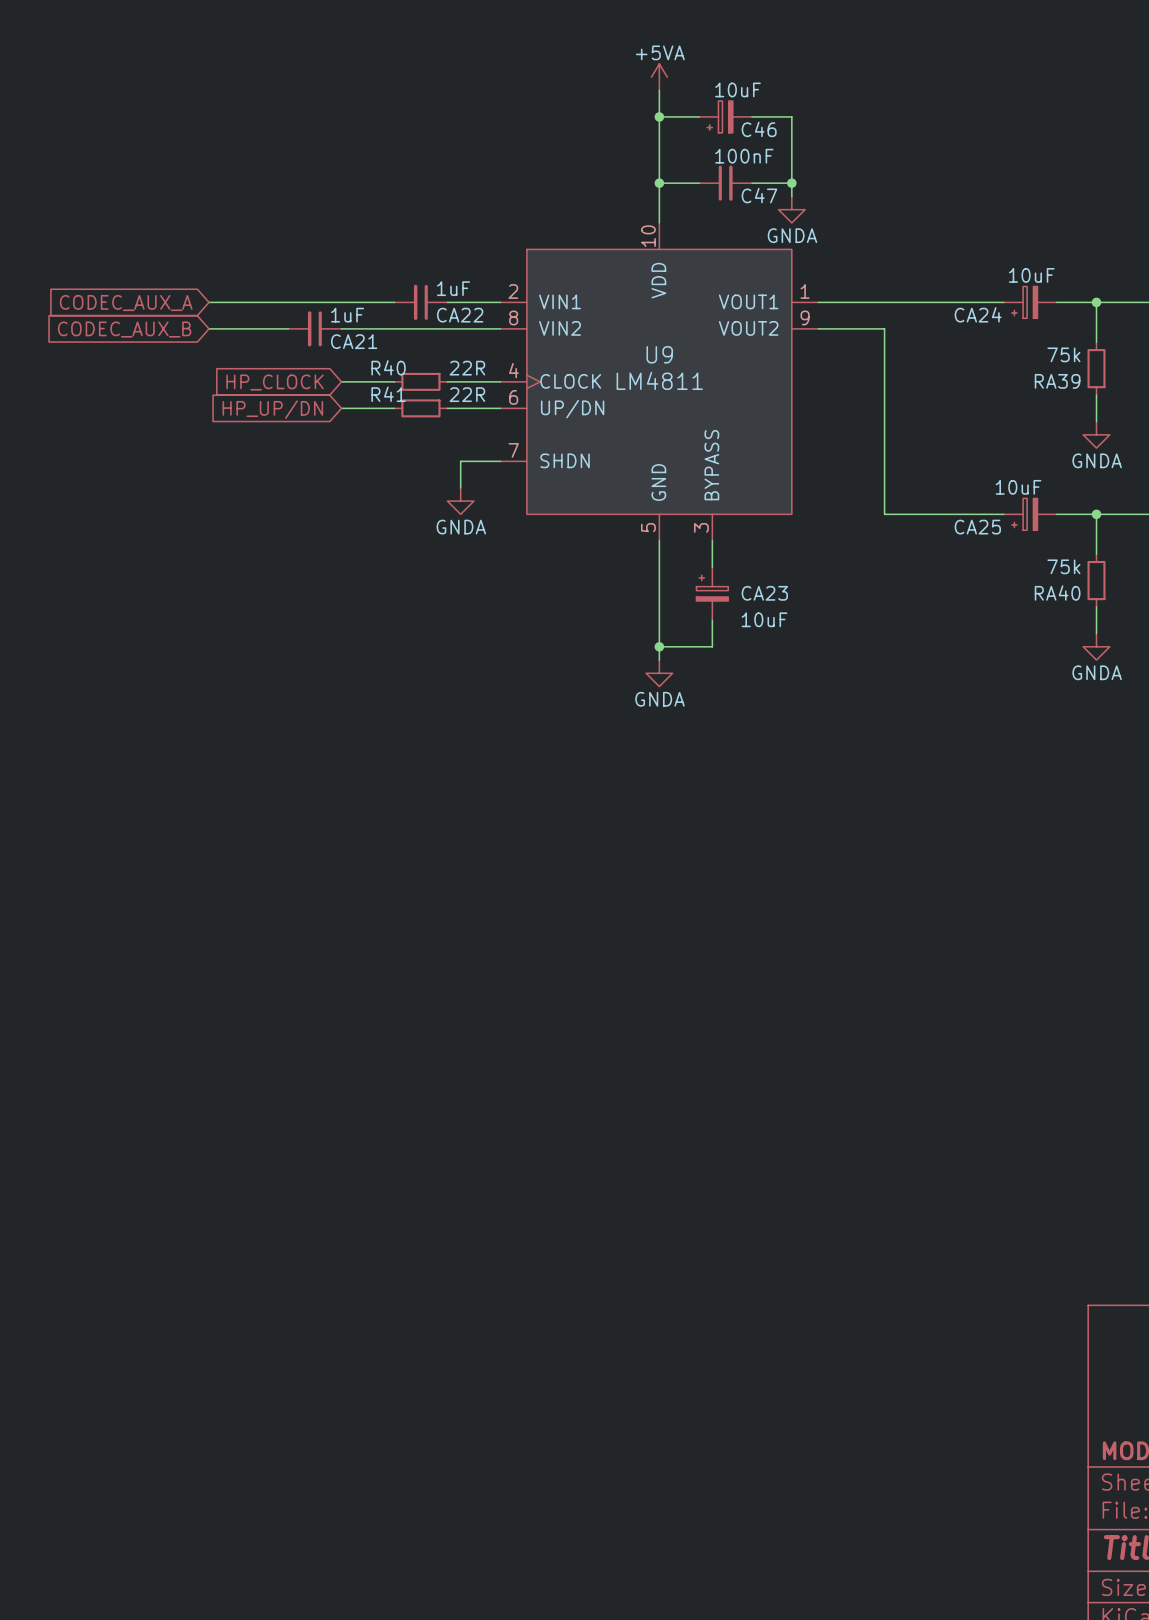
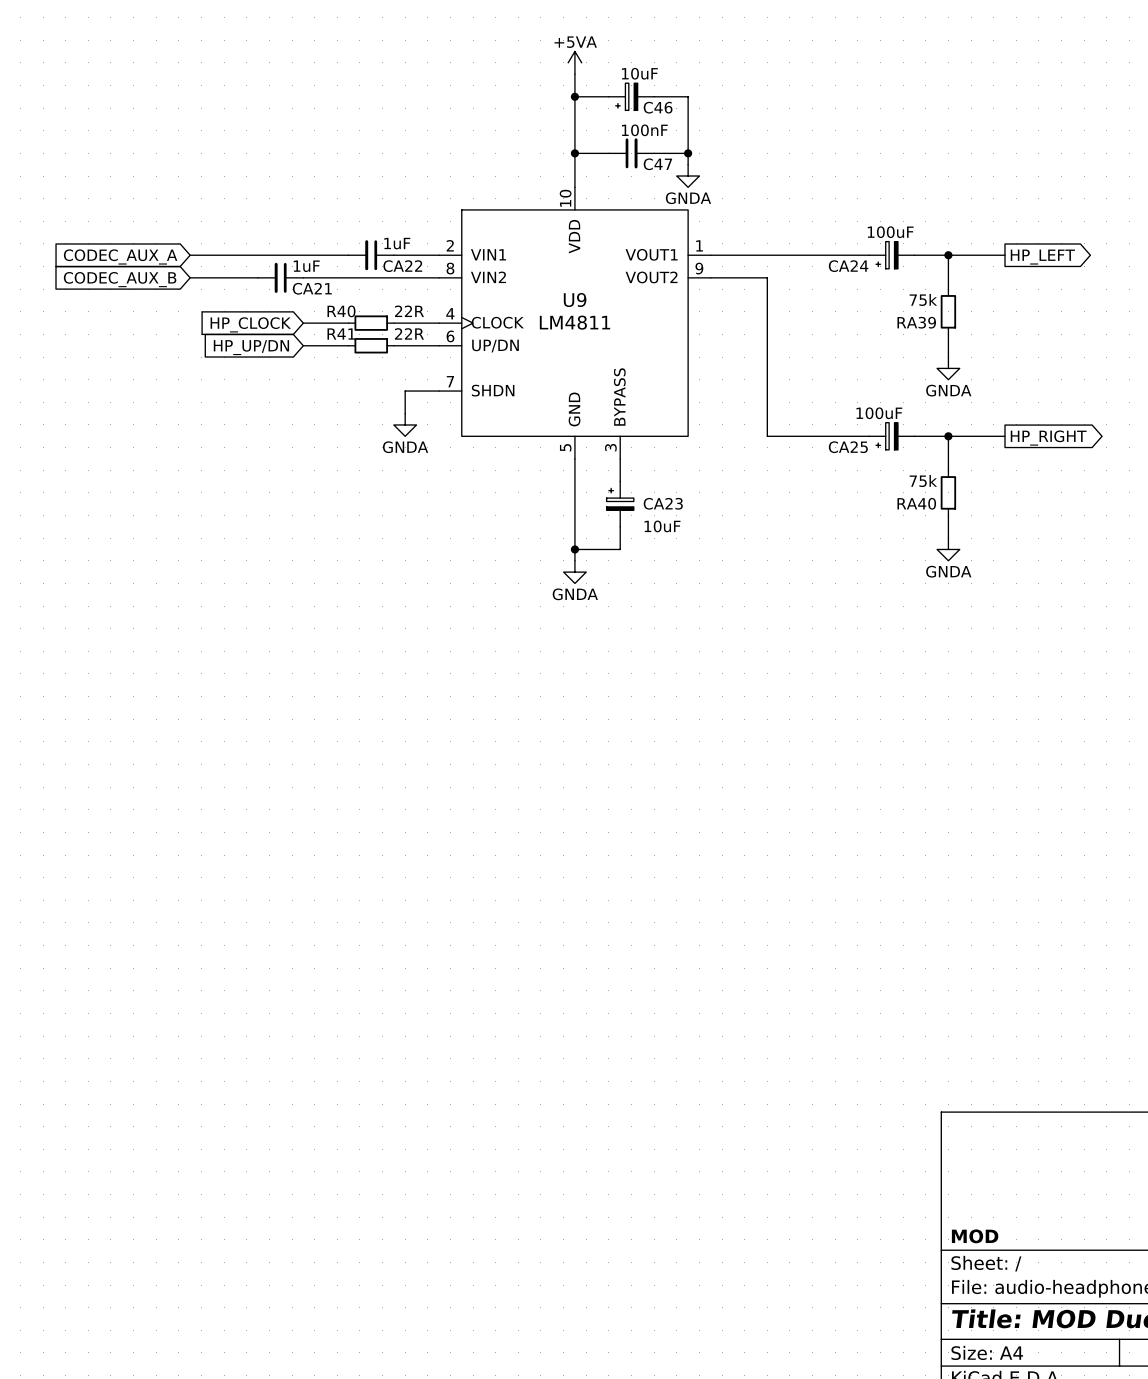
CA24 value: 10uF (1031, 275) -> 100uF (890, 232)
CA25 value: 10uF (1018, 487) -> 100uF (879, 413)

